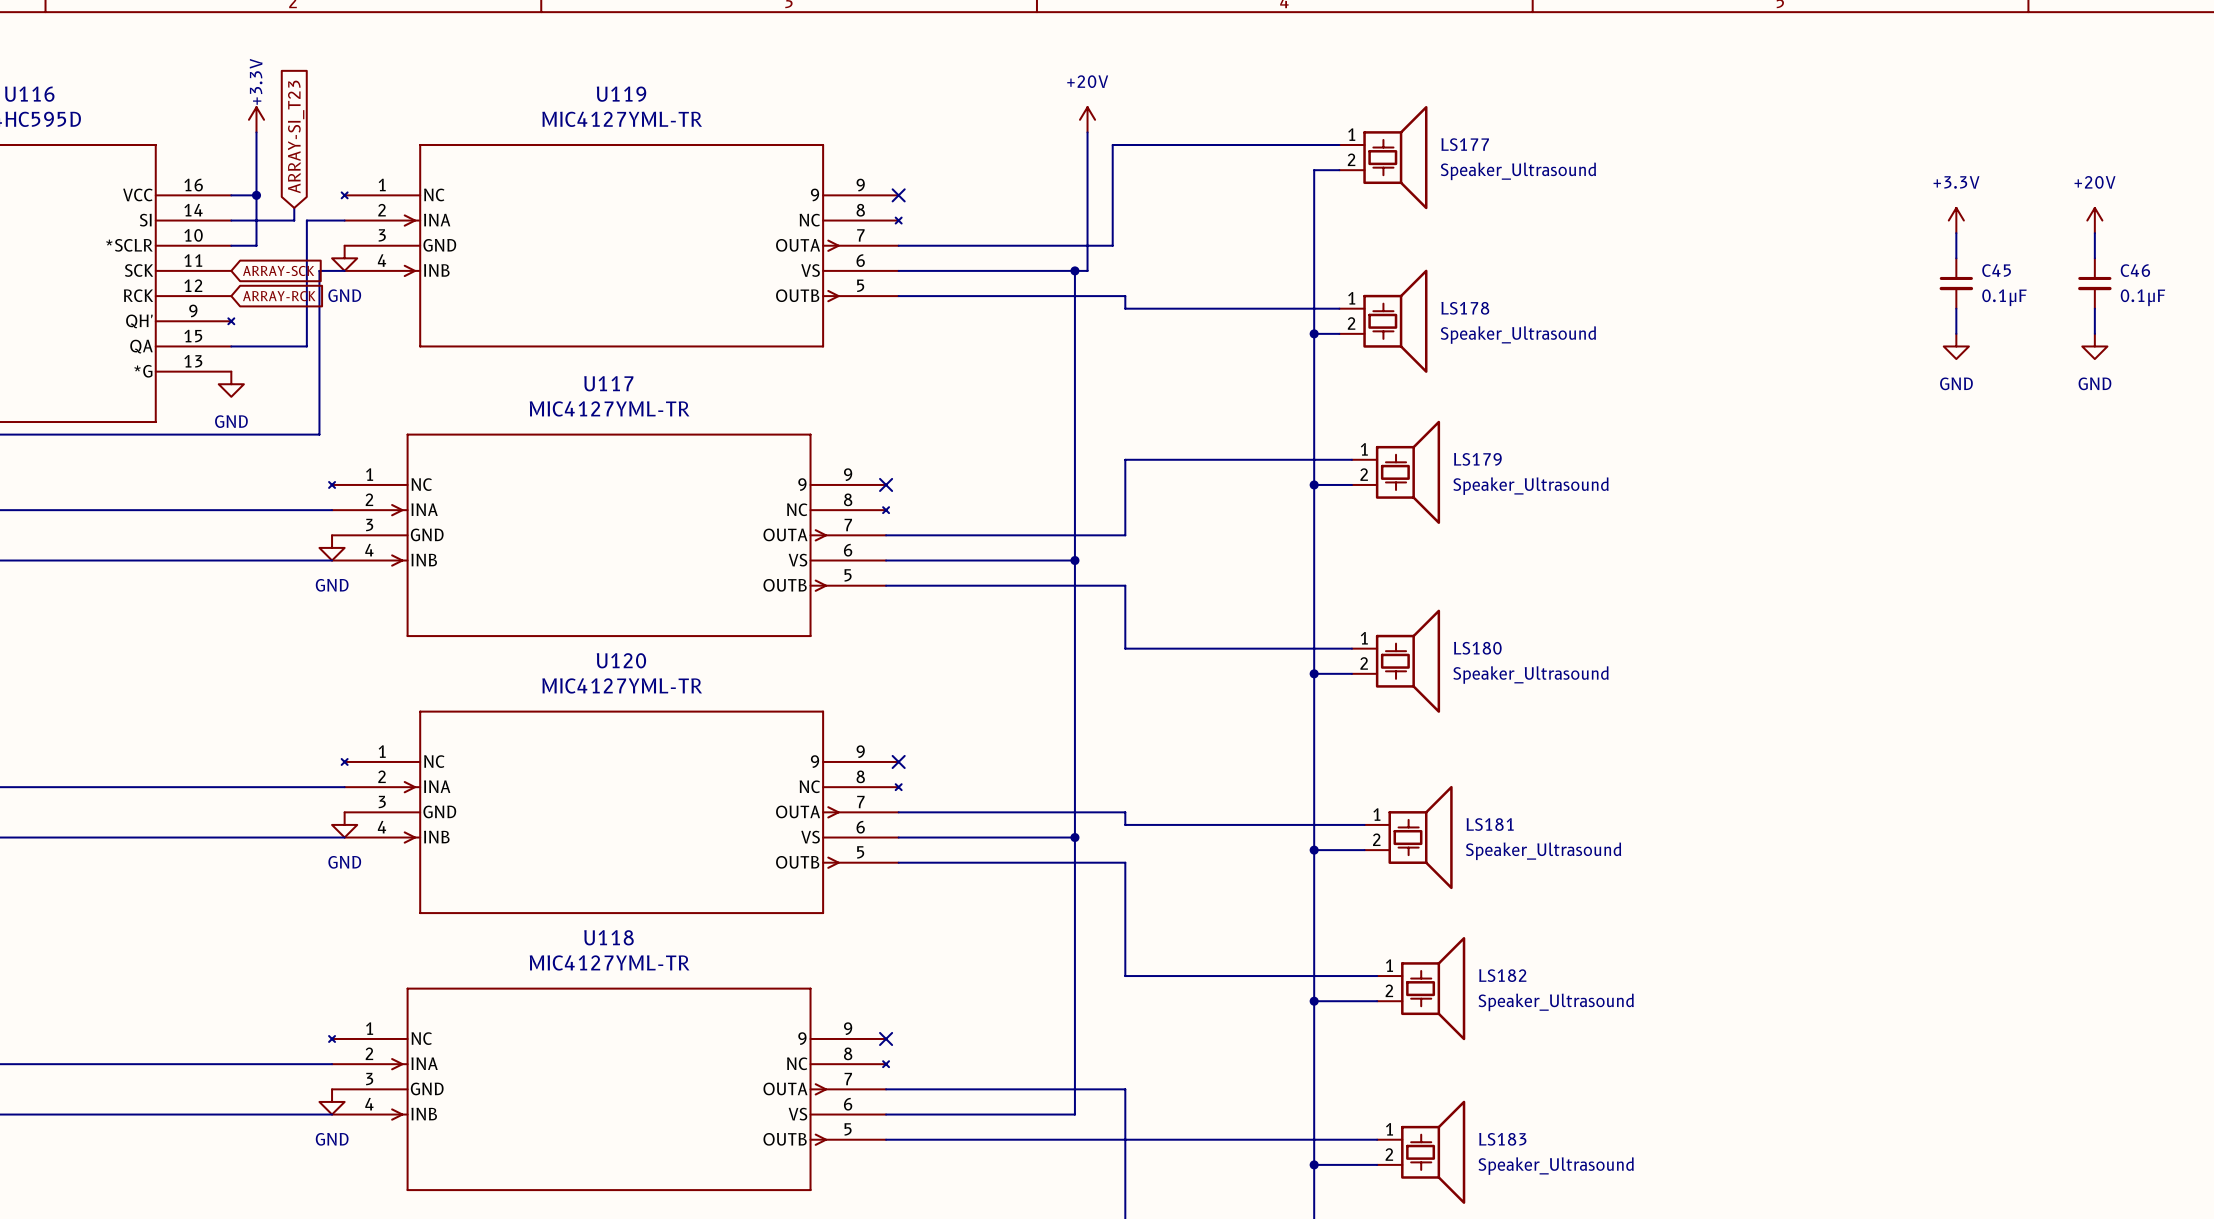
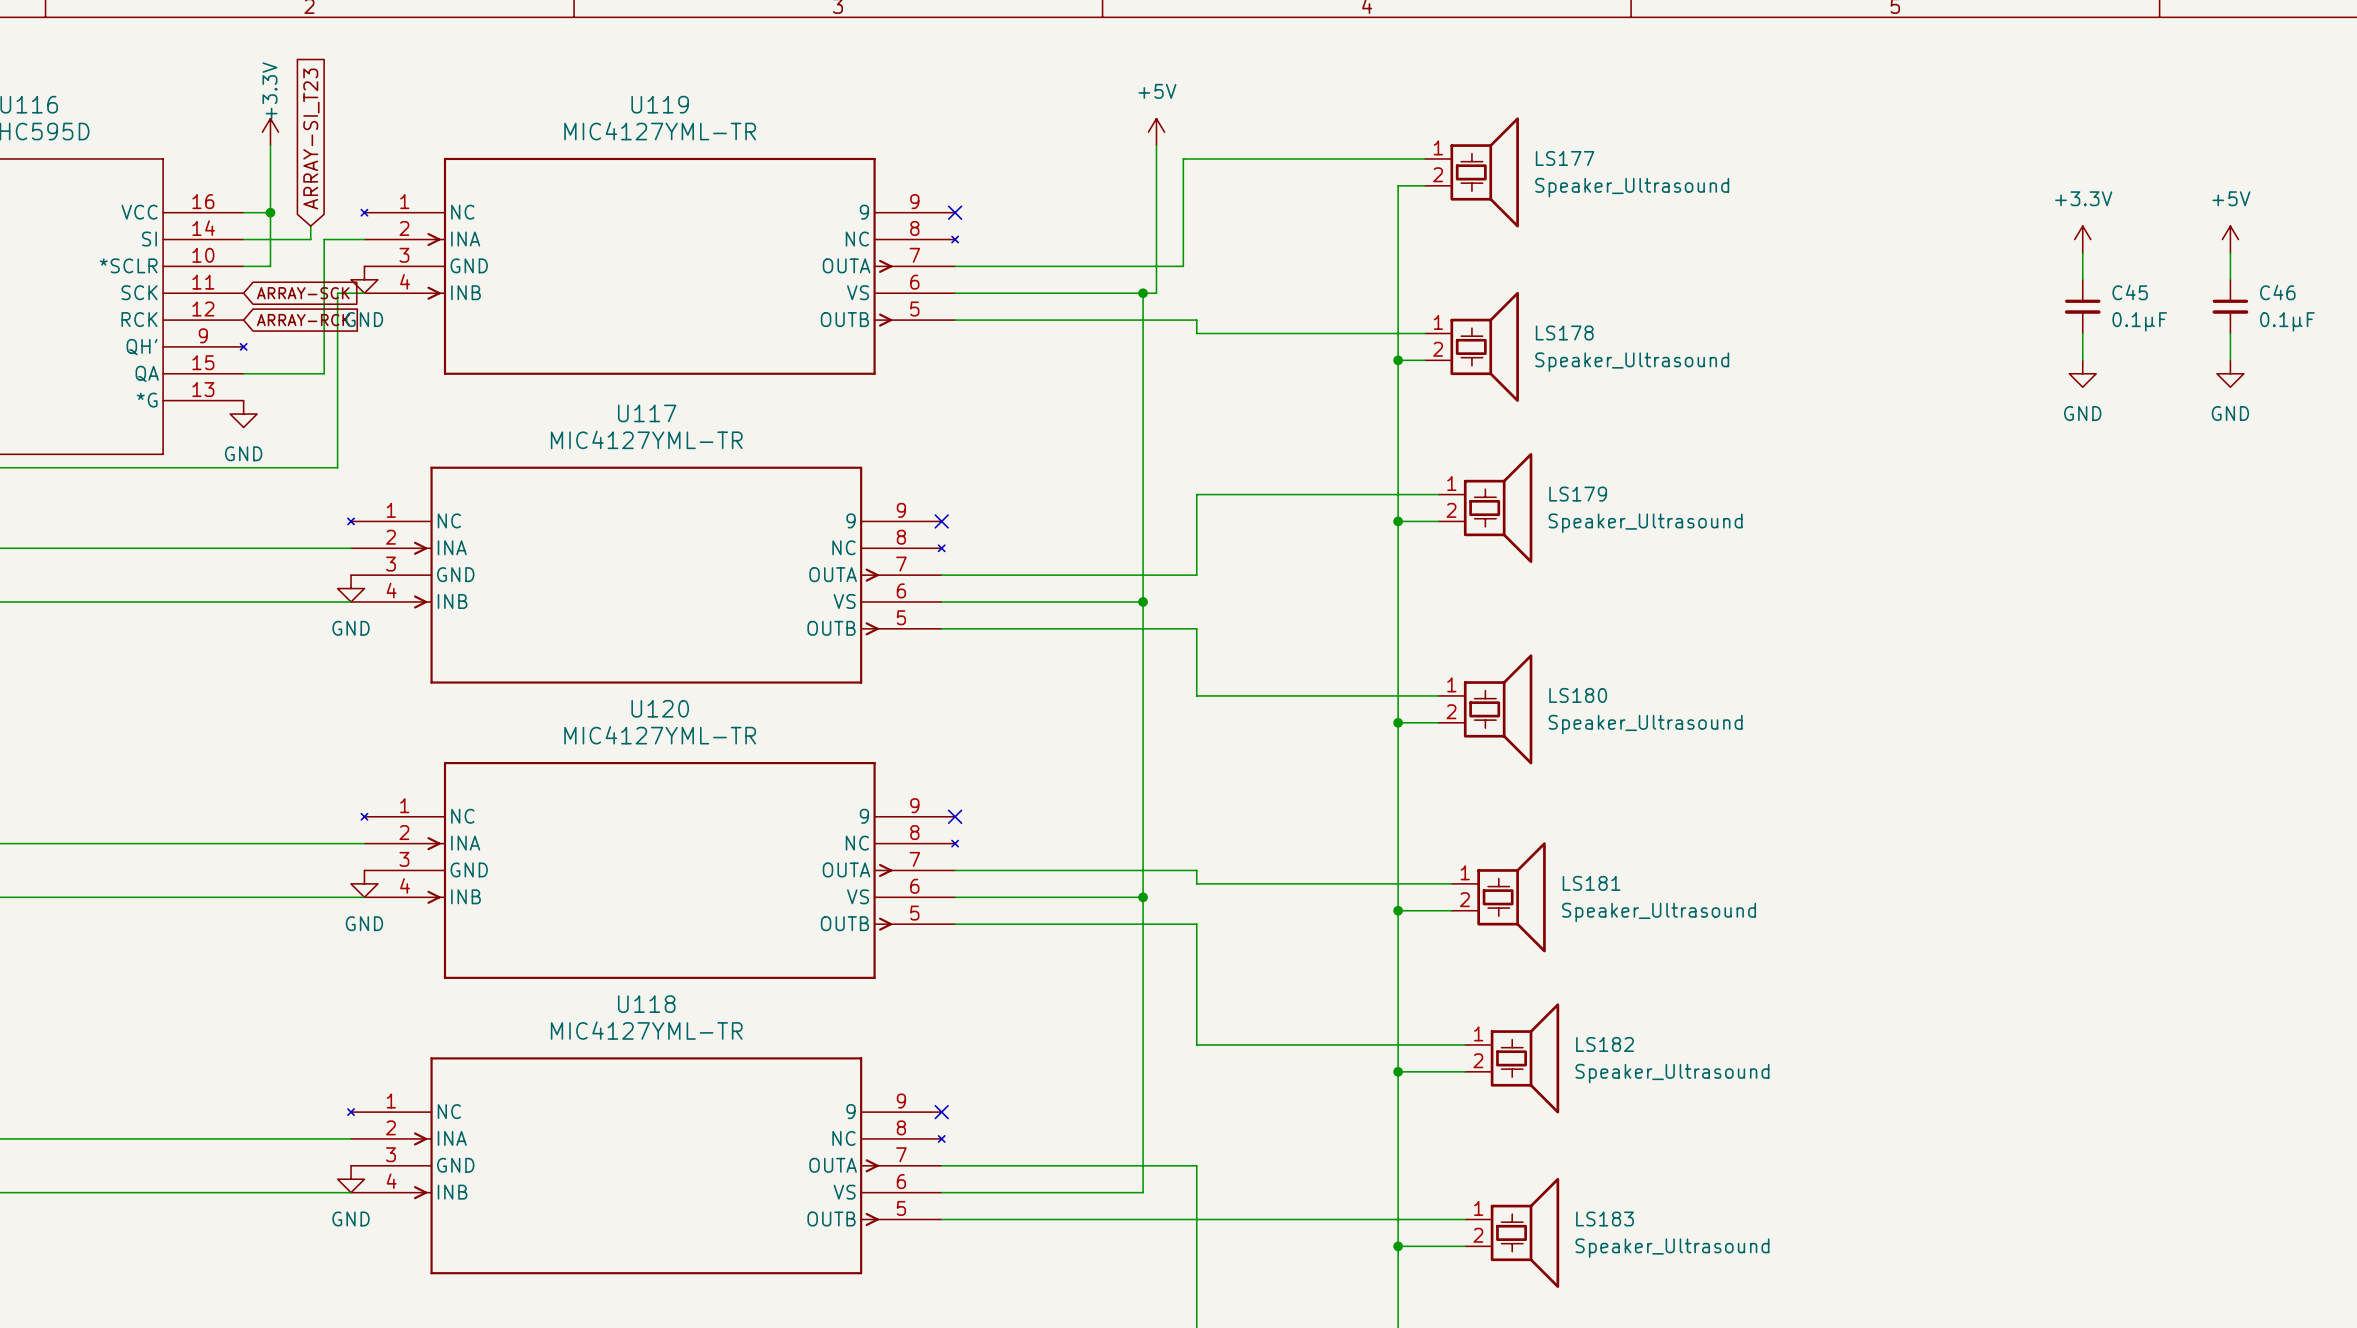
power symbol: +20V (1087, 119) -> +5V (1156, 132)
power symbol: +20V (2094, 220) -> +5V (2230, 239)

